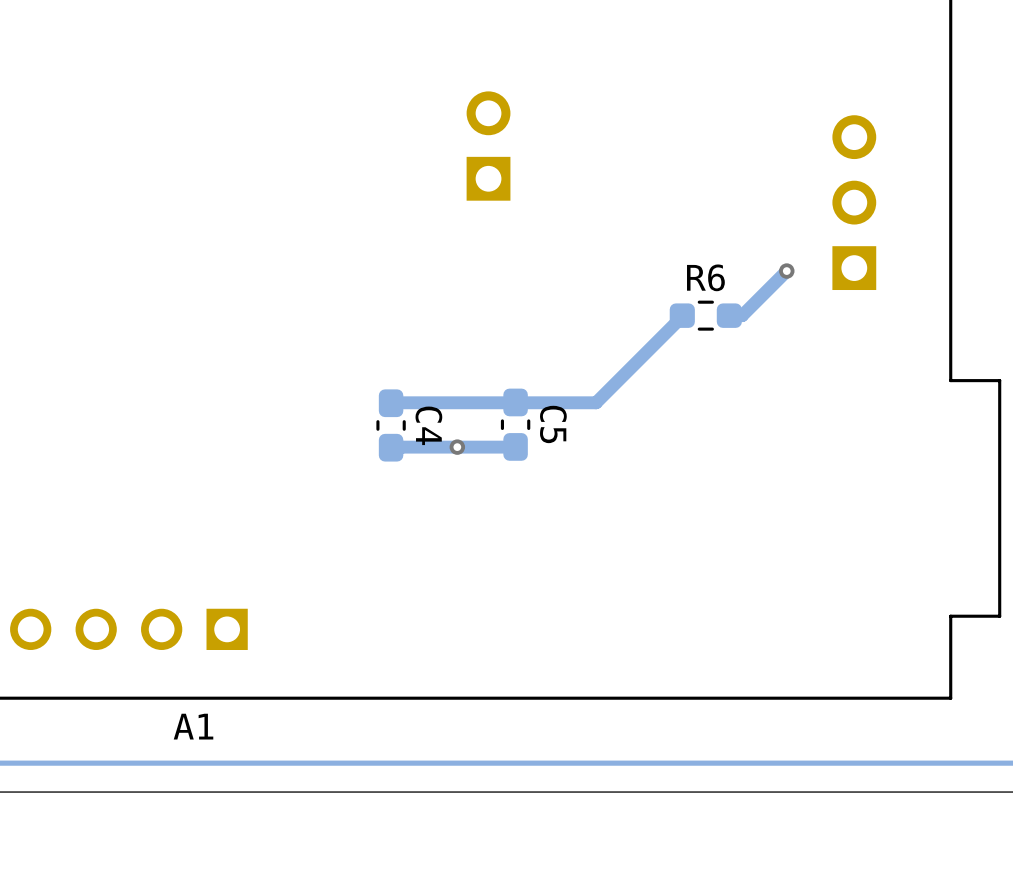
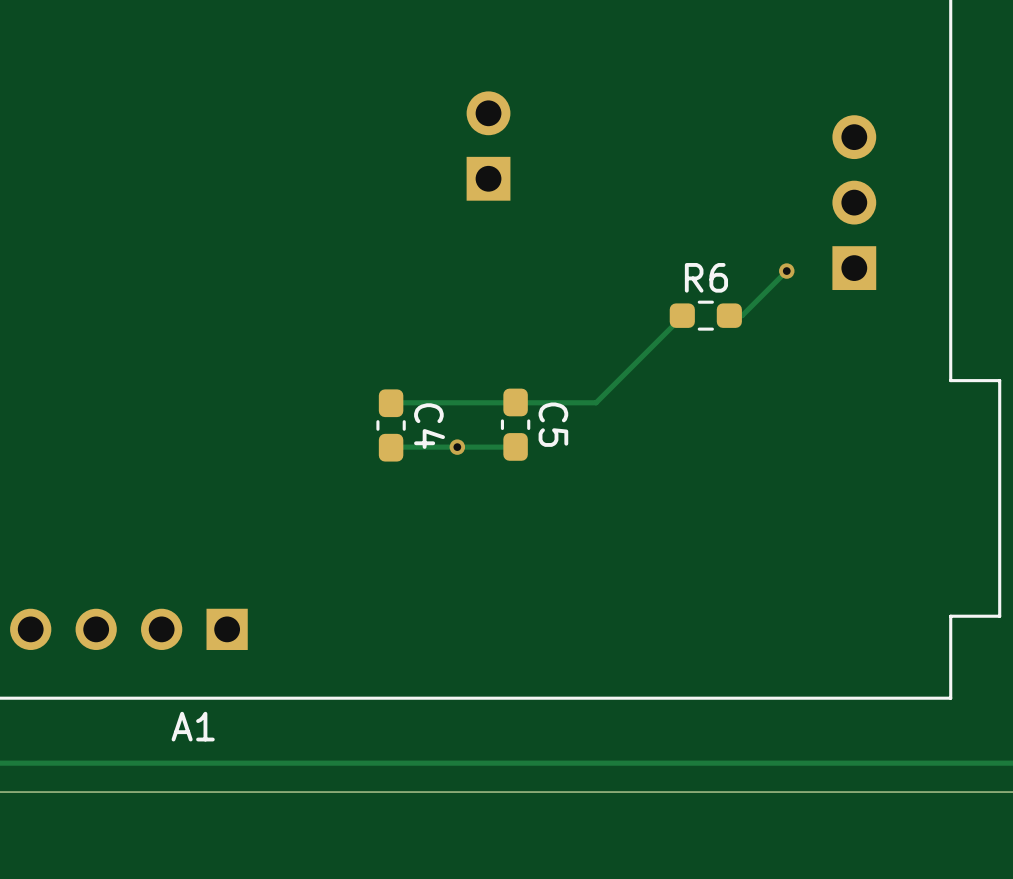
track width: thick (786, 271) (742, 315) (728, 315) -> thin (786, 271) (742, 315) (728, 315)
track width: thick (683, 315) (596, 402) (391, 403) -> thin (683, 315) (596, 402) (391, 403)
track width: thick (515, 446) (401, 447) -> thin (515, 446) (401, 447)

